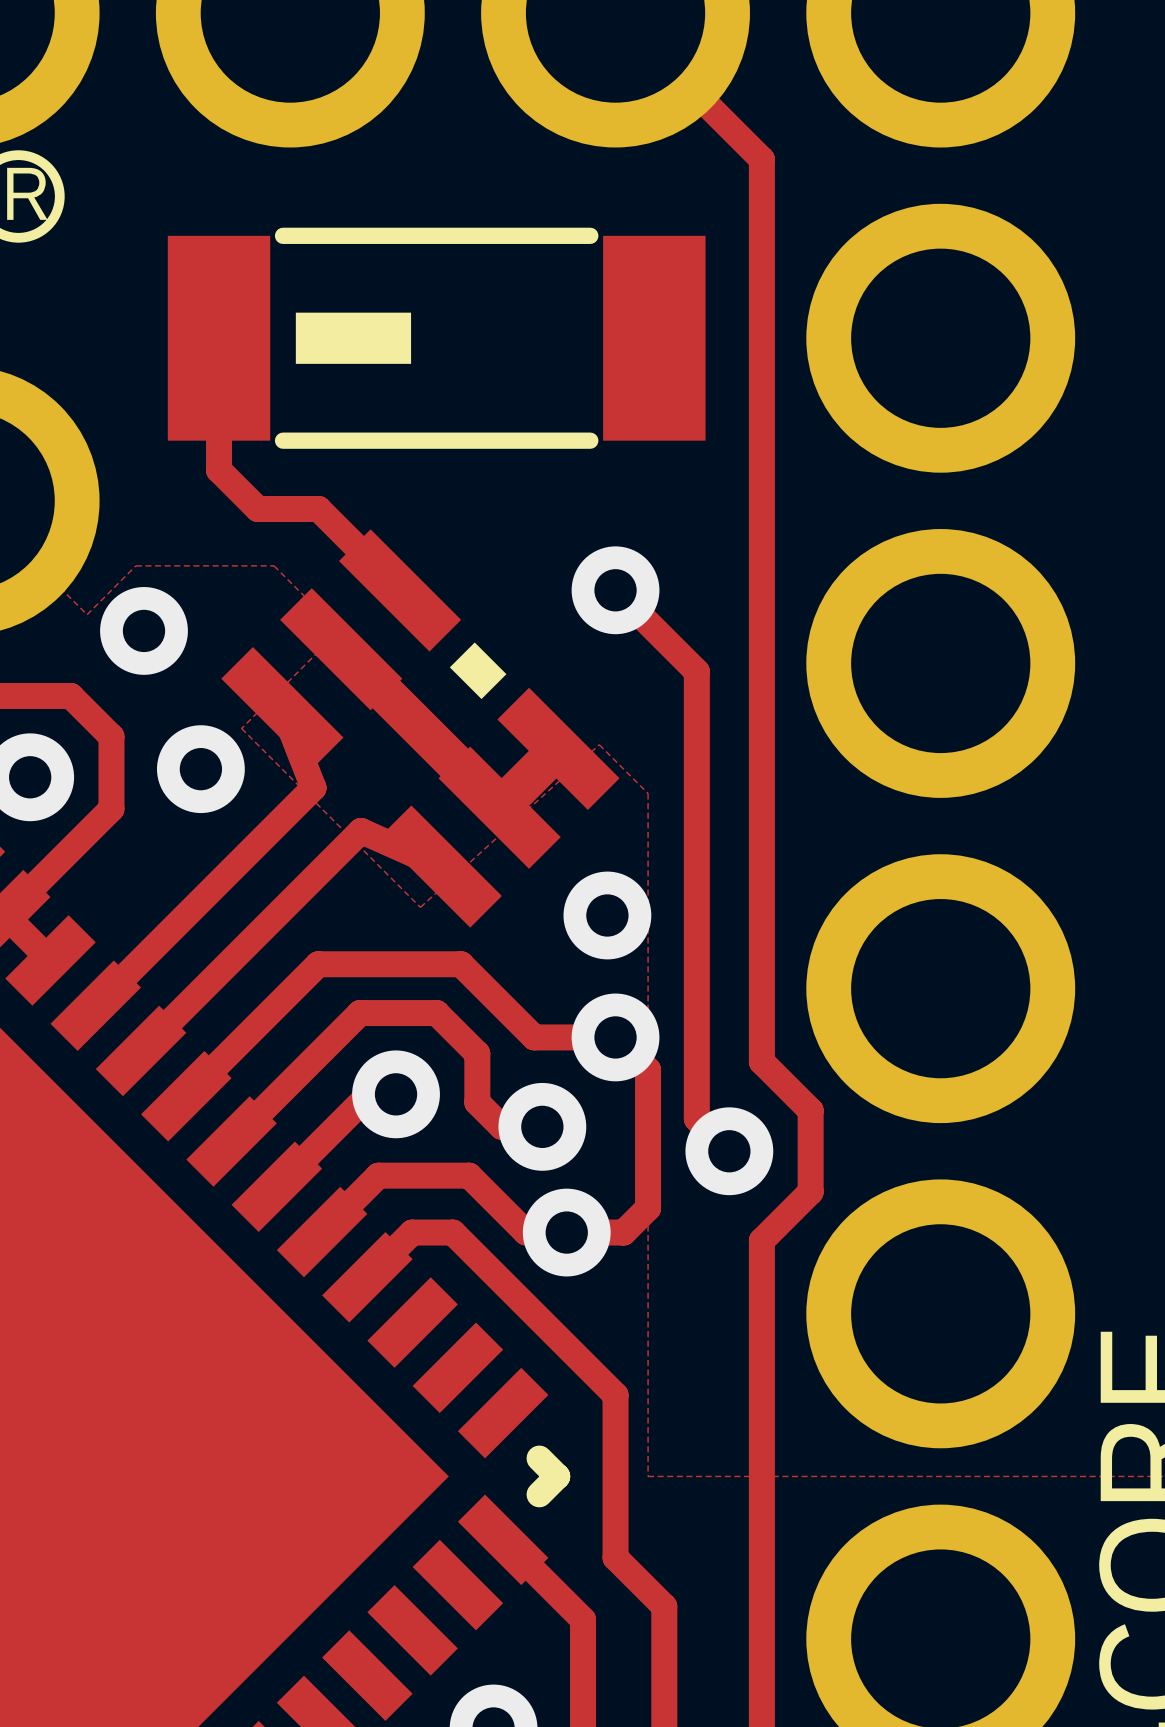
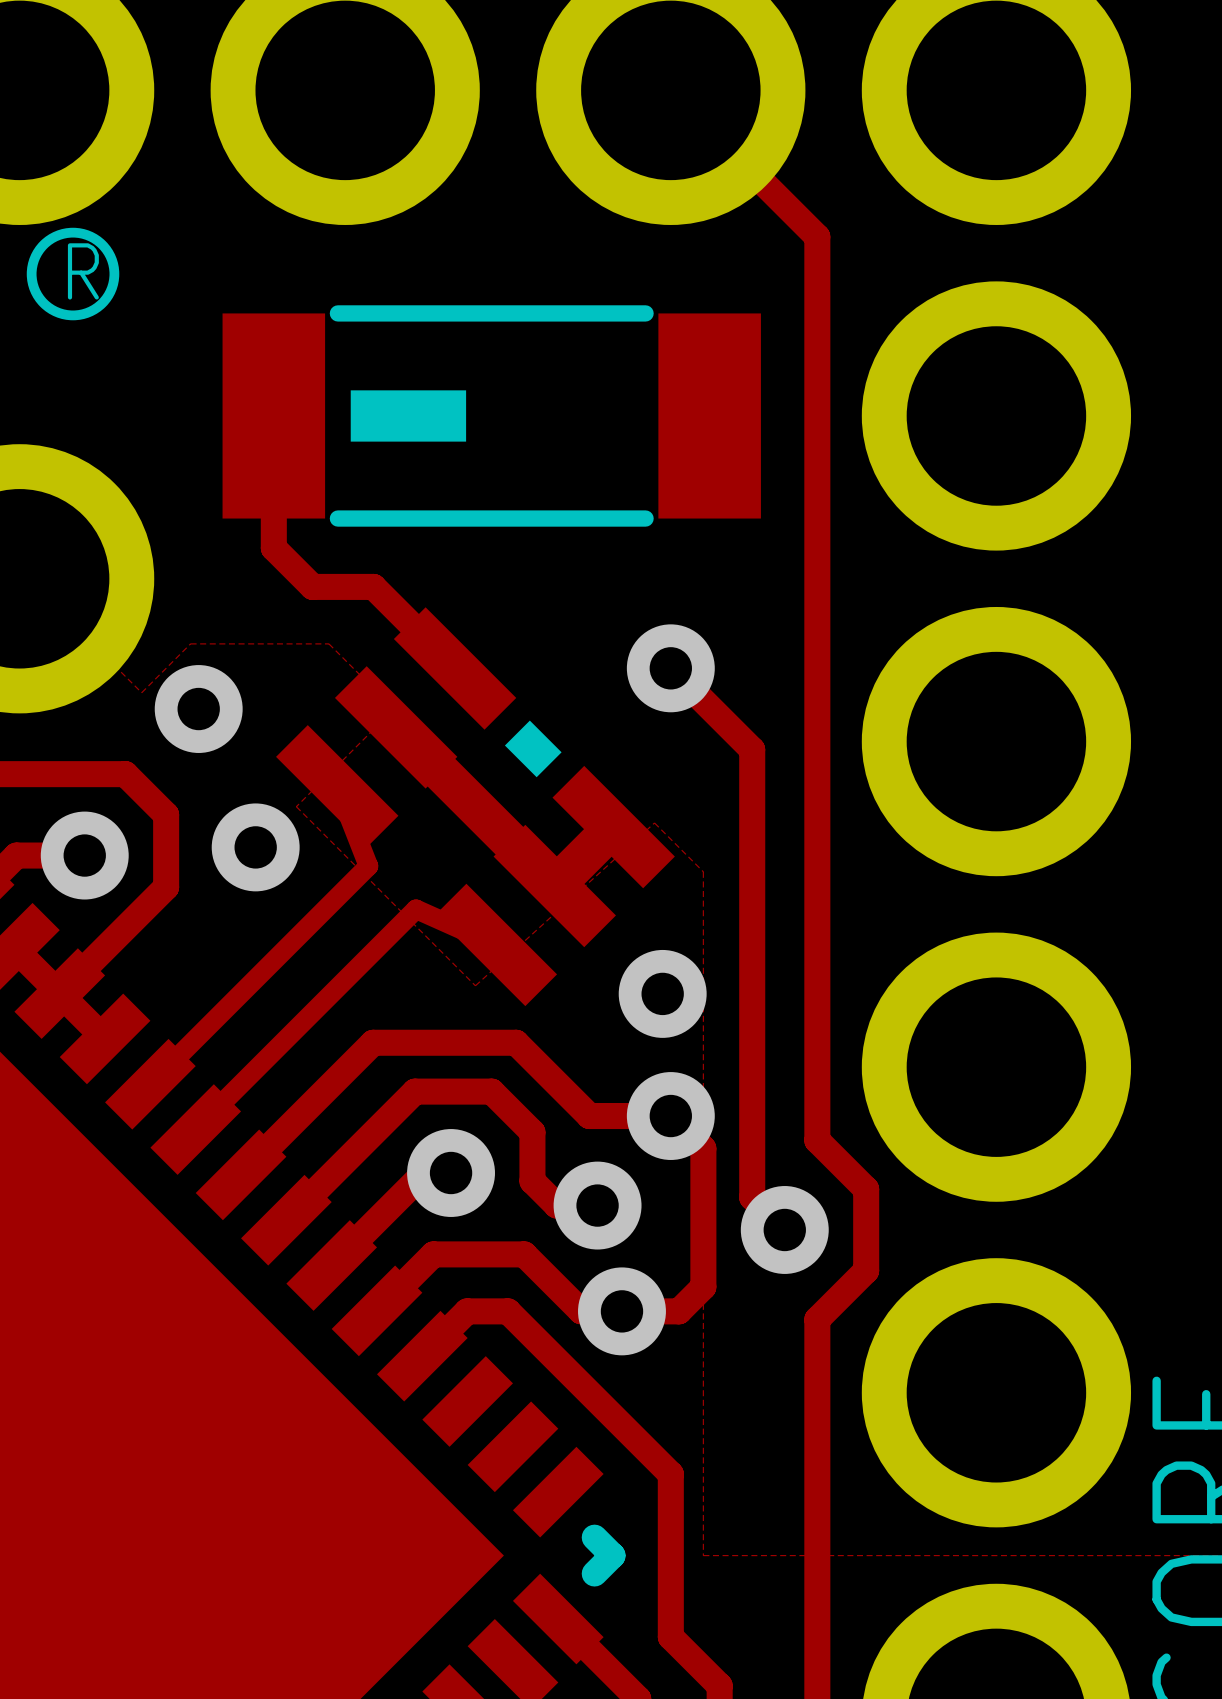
track width: thick (282, 708) (313, 787) (95, 1005) -> thin (337, 786) (368, 866) (150, 1084)
track width: thick (440, 866) (361, 830) (141, 1050) -> thin (495, 944) (416, 909) (195, 1129)

